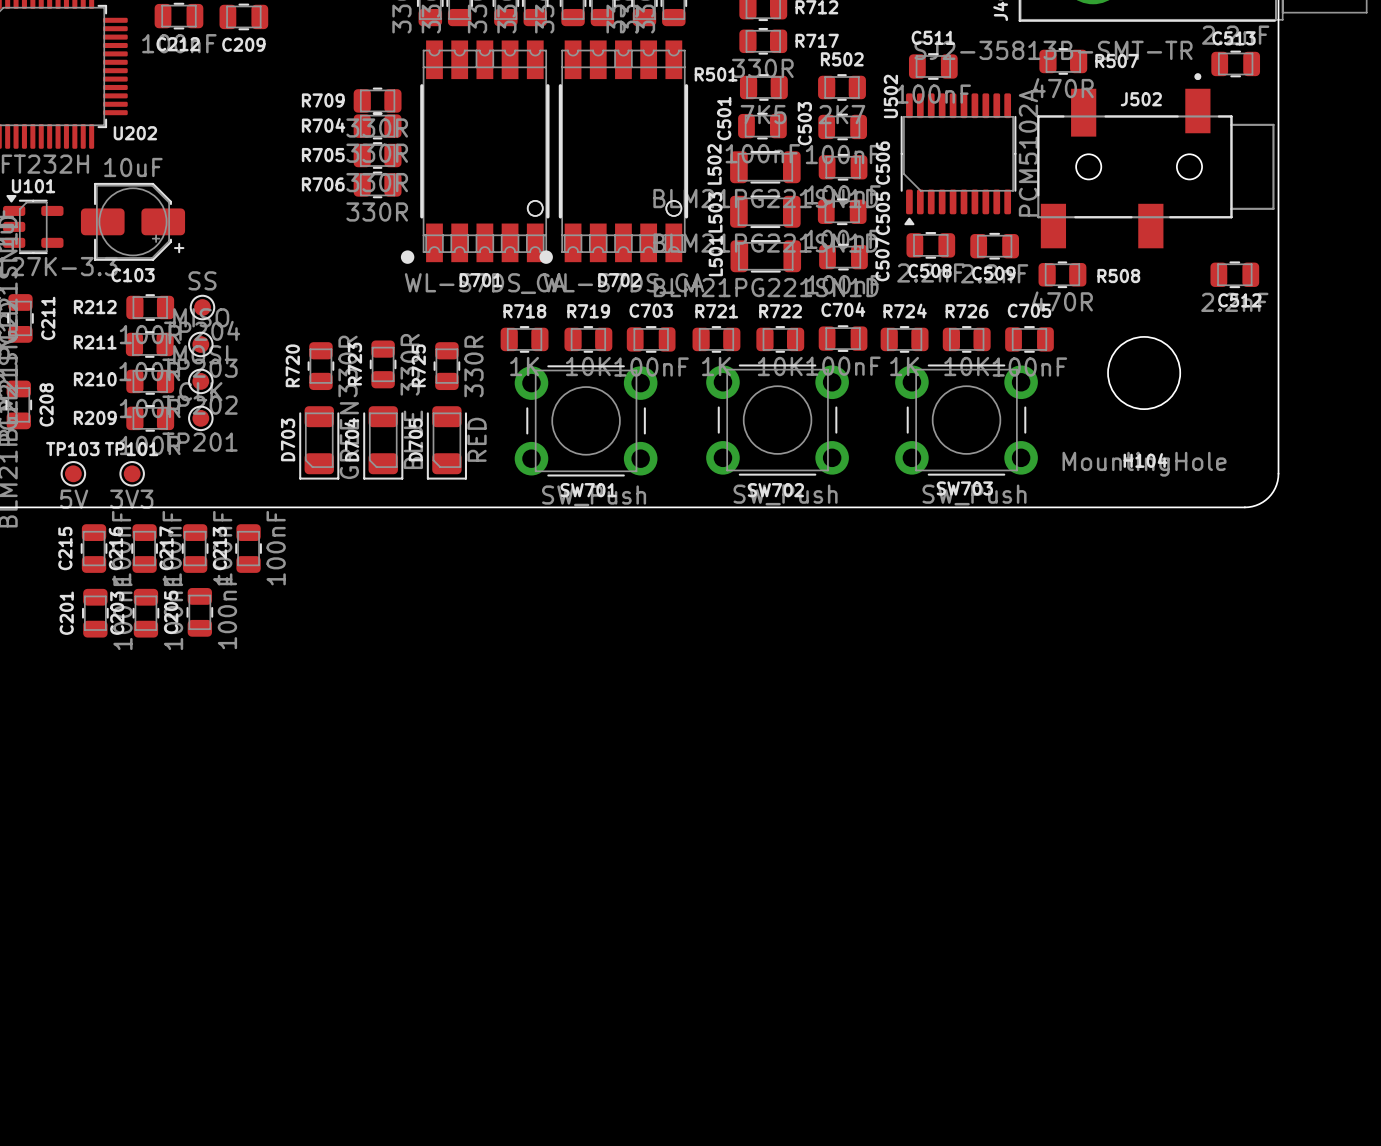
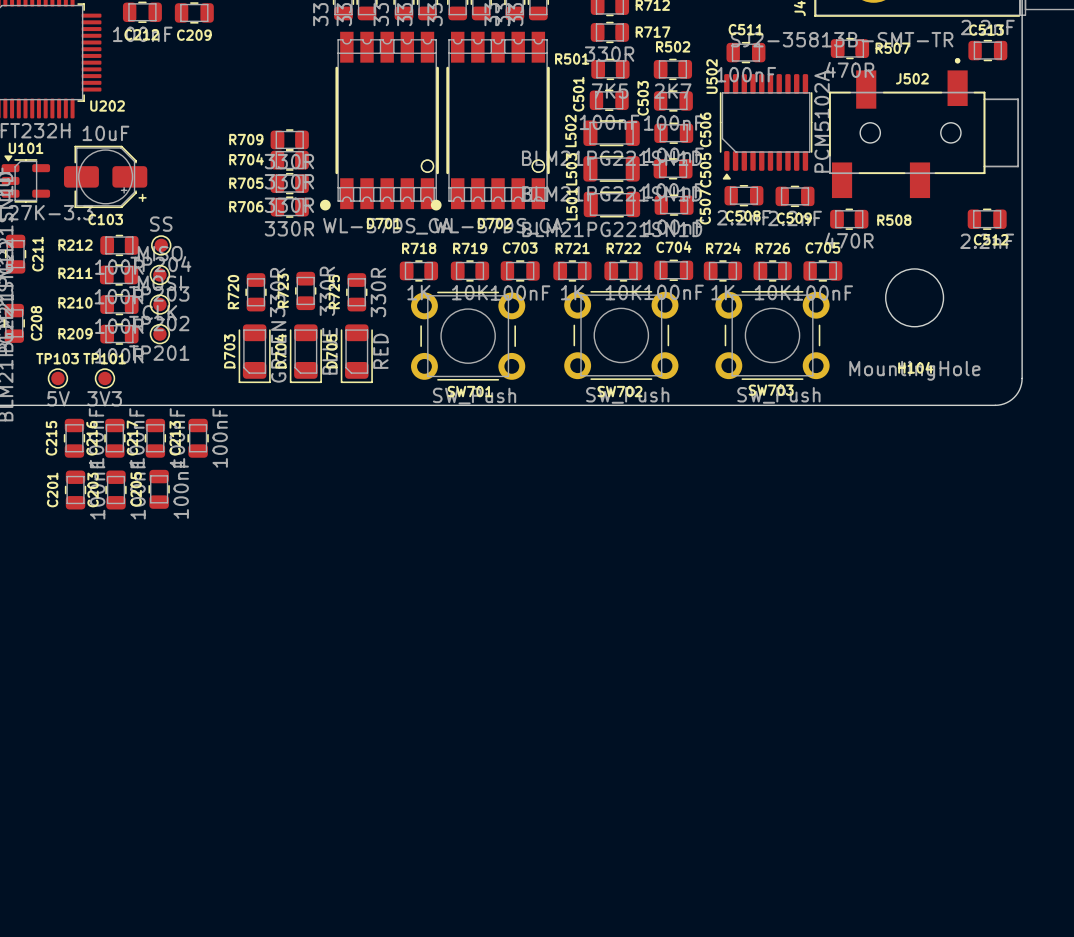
R709 position: (377, 100) -> (289, 139)
R704 position: (377, 126) -> (289, 160)
R705 position: (377, 155) -> (289, 183)
R706 position: (377, 184) -> (289, 207)

